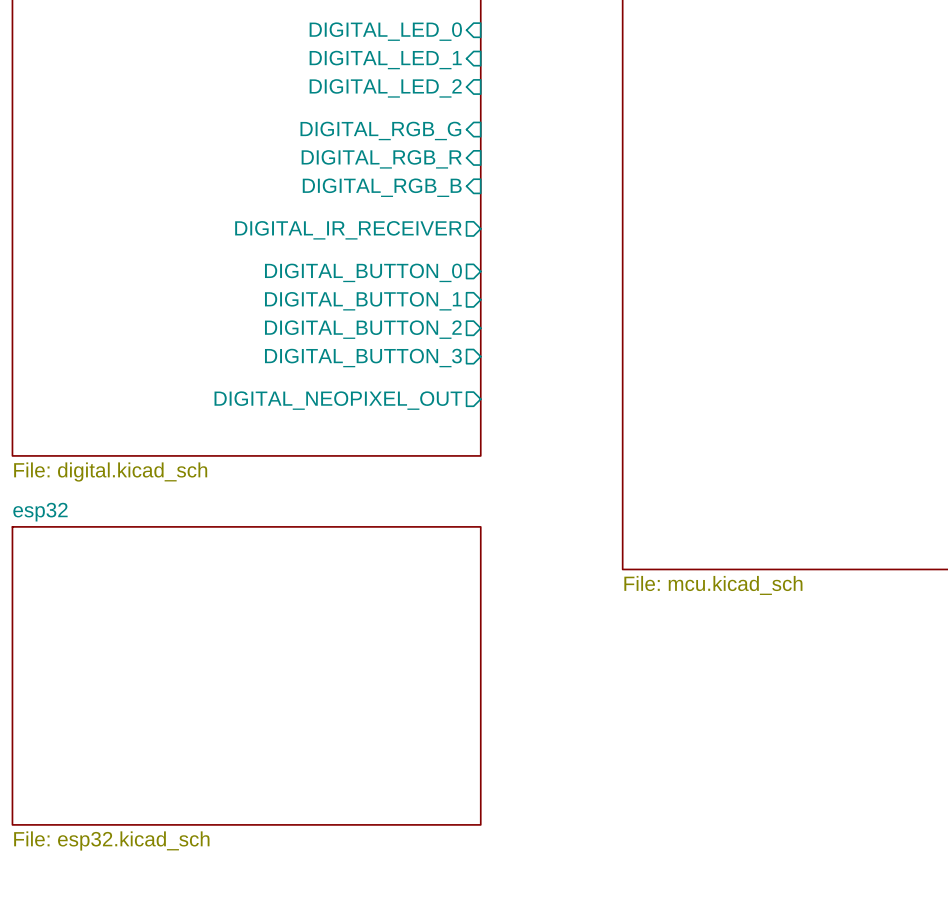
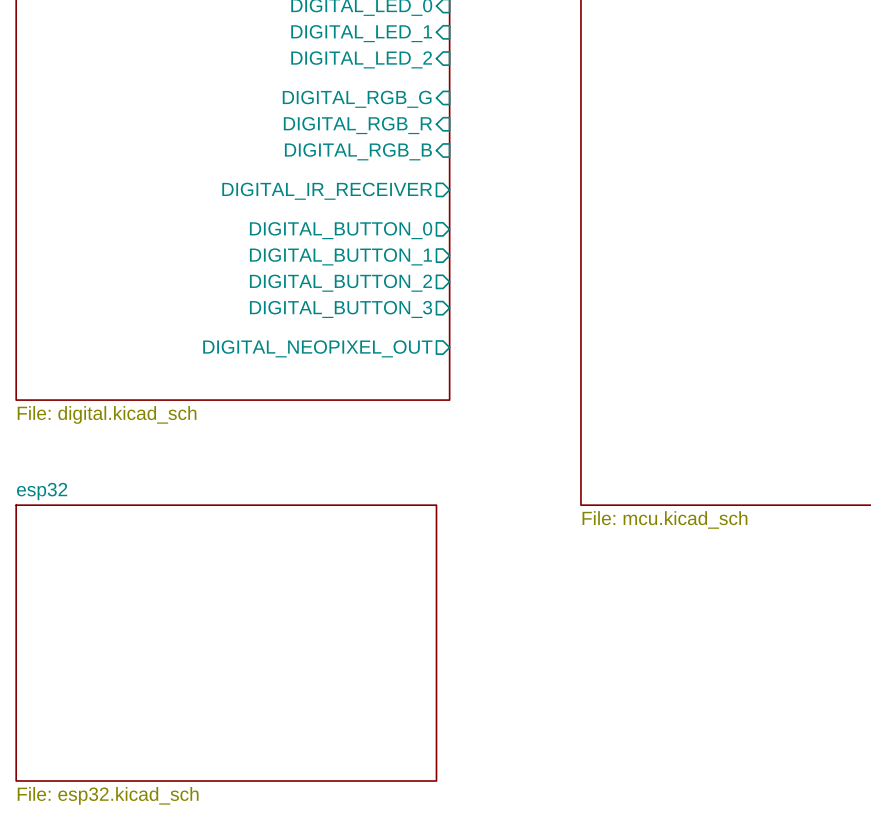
sheet esp32 shape: [11, 526, 482, 826] -> [15, 504, 438, 782]

